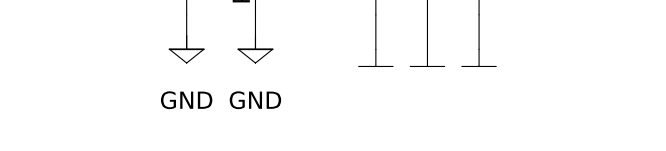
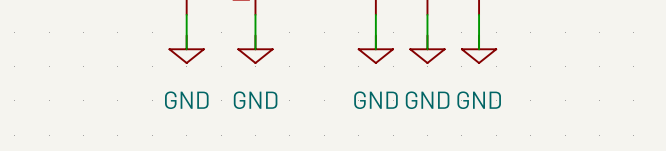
power symbol shape: [358, 49, 394, 67] -> [357, 35, 394, 64]
power symbol shape: [410, 49, 445, 67] -> [409, 35, 446, 64]
power symbol shape: [461, 49, 497, 67] -> [461, 35, 498, 64]
power symbol text: none -> GND (375, 100)
power symbol text: none -> GND (427, 100)
power symbol text: none -> GND (479, 100)

